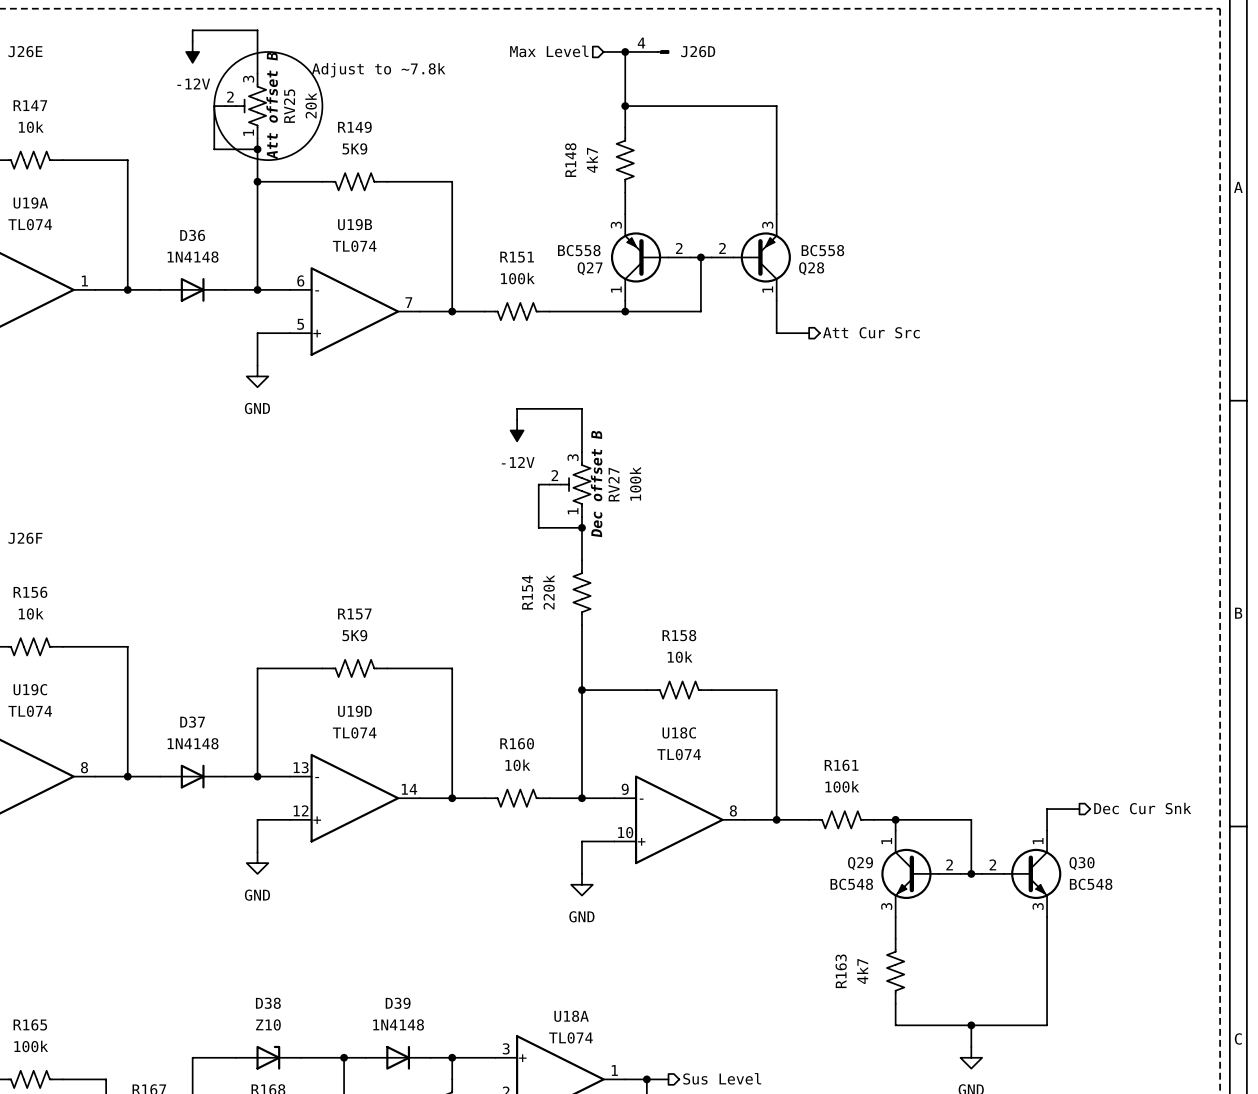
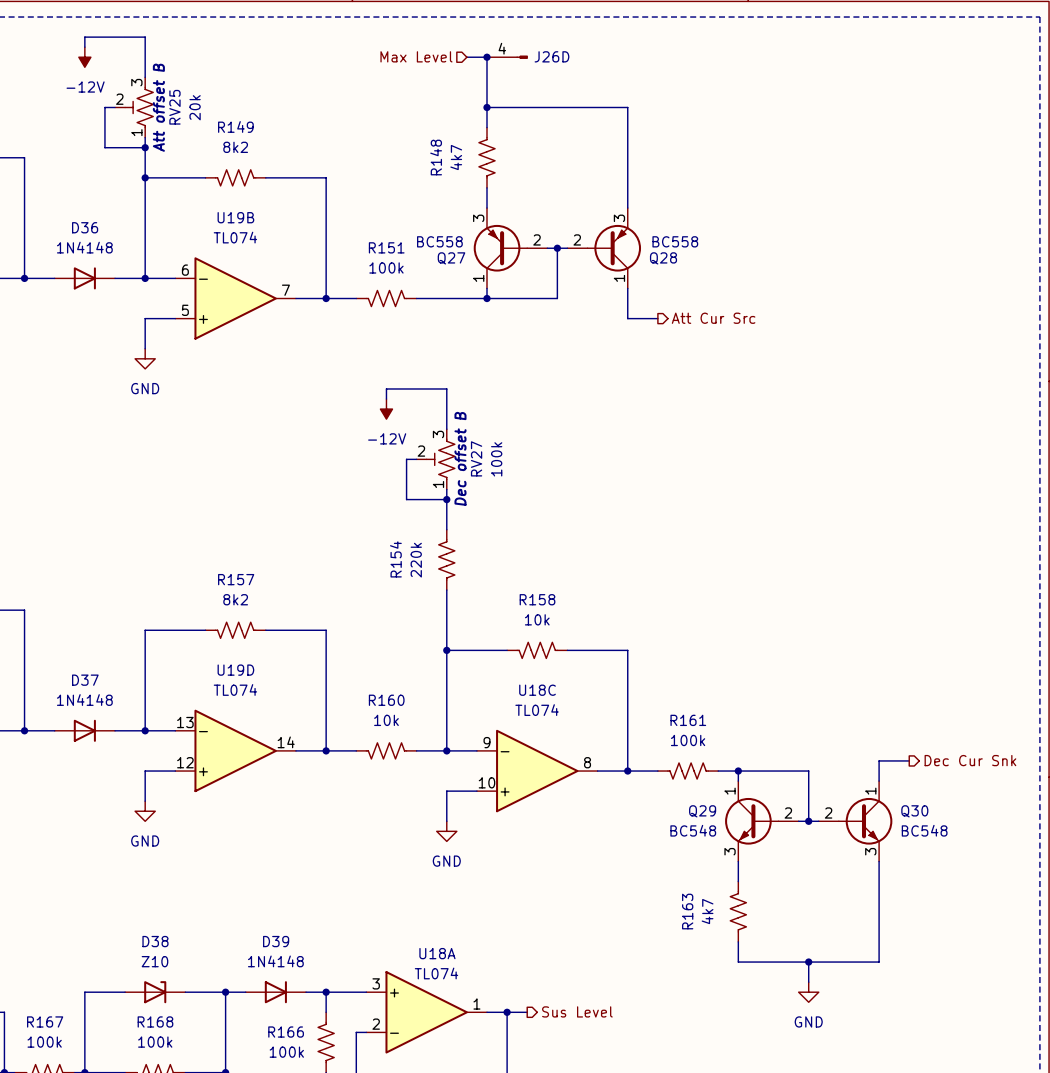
drawing: [214, 51, 323, 161] -> none
text: Adjust to ~7.8k (378, 70) -> none
R149 value: 5K9 (354, 148) -> 8k2 (235, 147)
R157 value: 5K9 (354, 635) -> 8k2 (235, 599)

